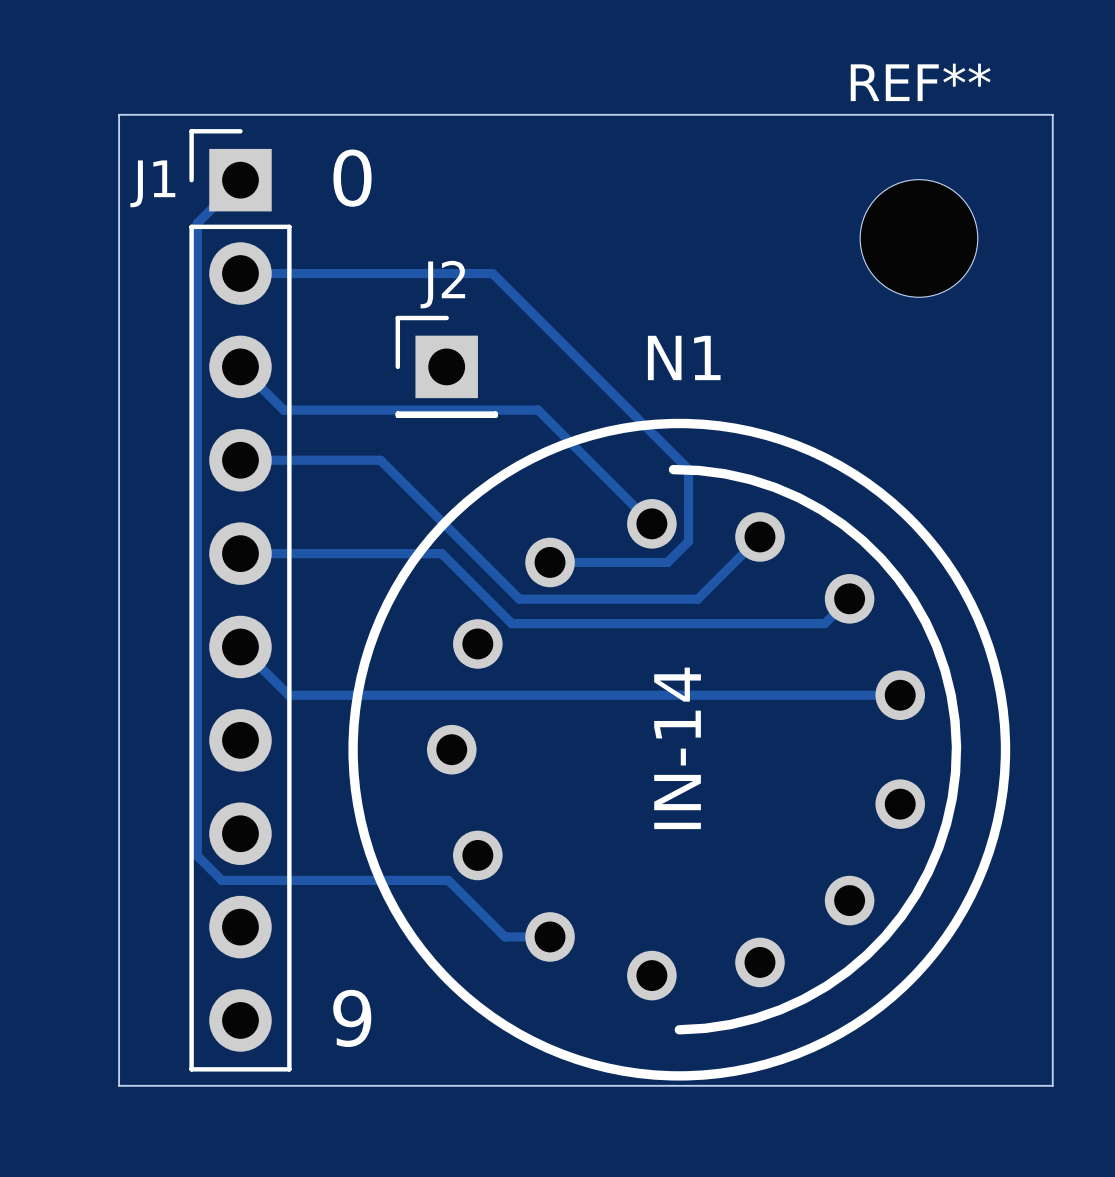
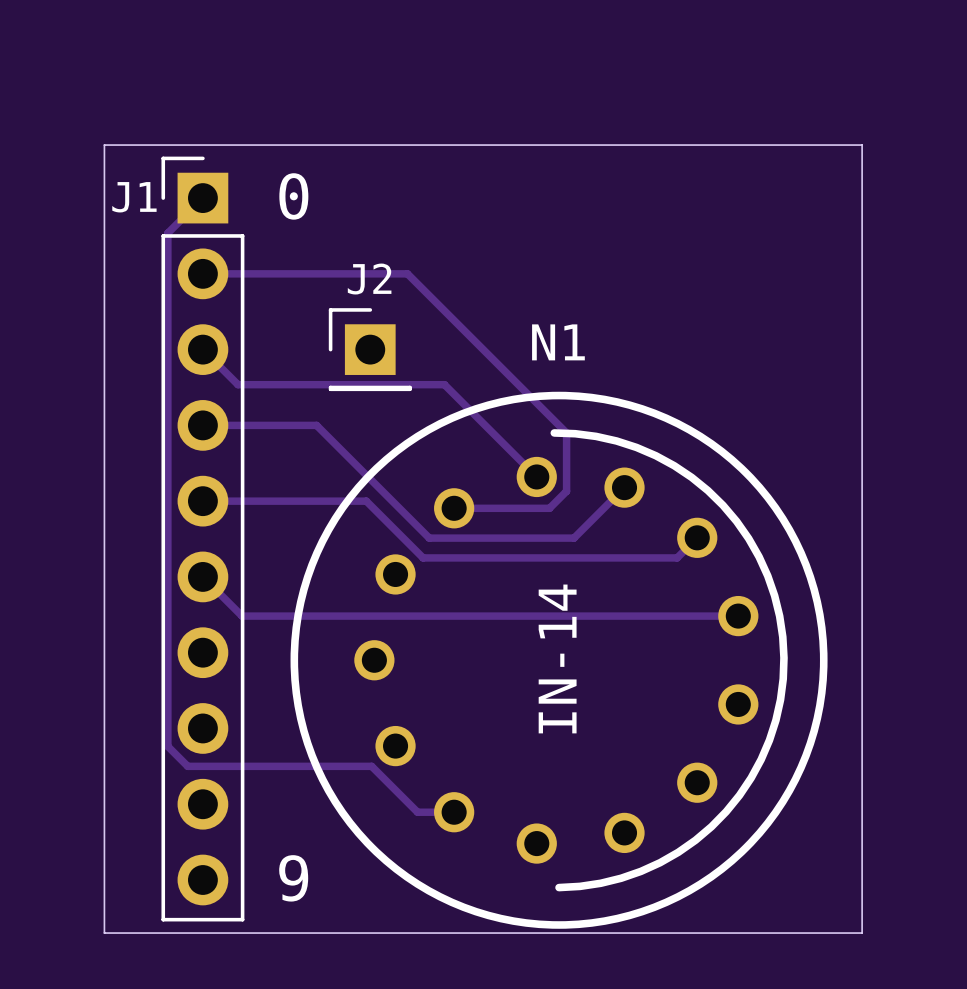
REF**: (918, 238) -> none

